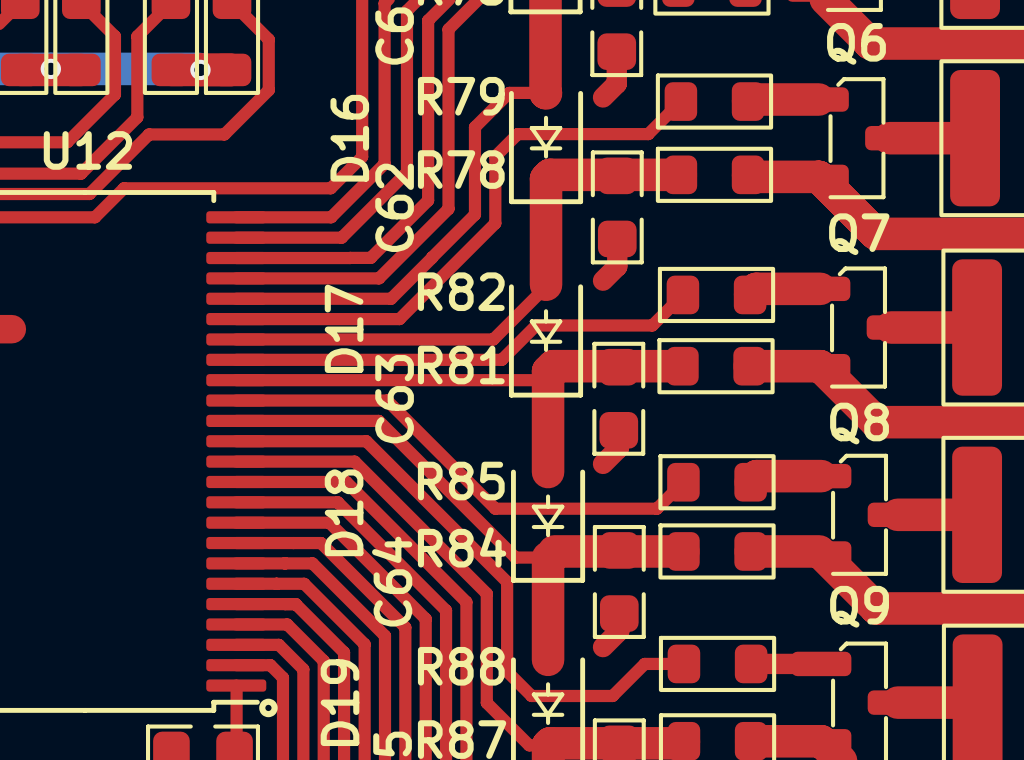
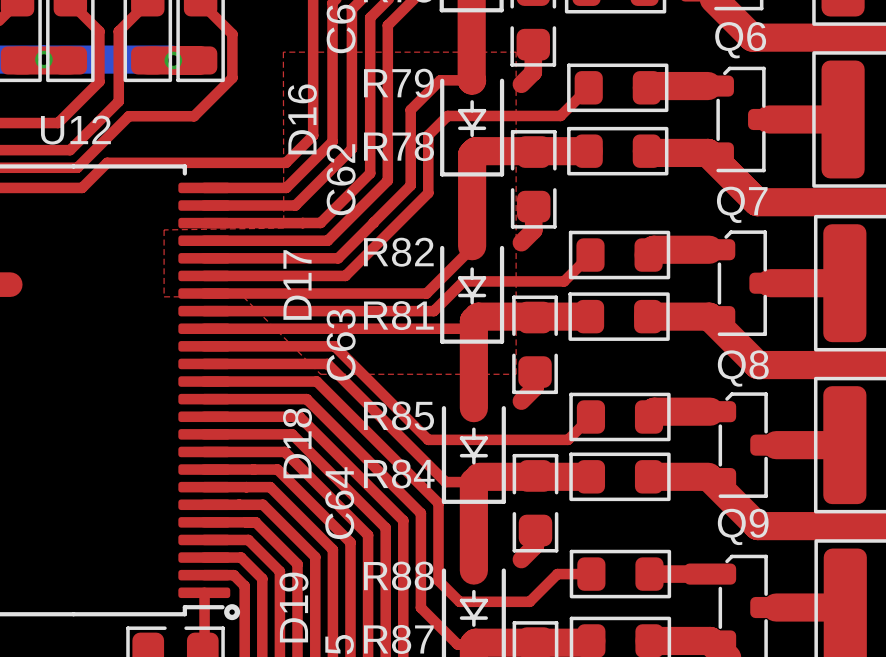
top zone outline: none -> (283, 52) (516, 52) (516, 374) (320, 374) (243, 296) (164, 296) (164, 229) (283, 228) (283, 52)

